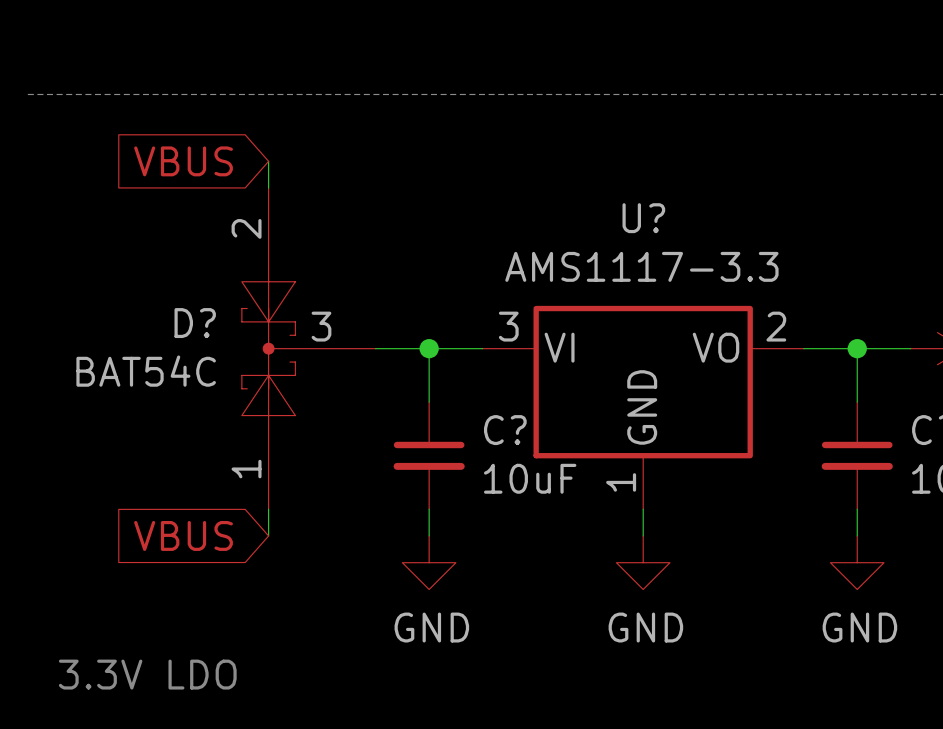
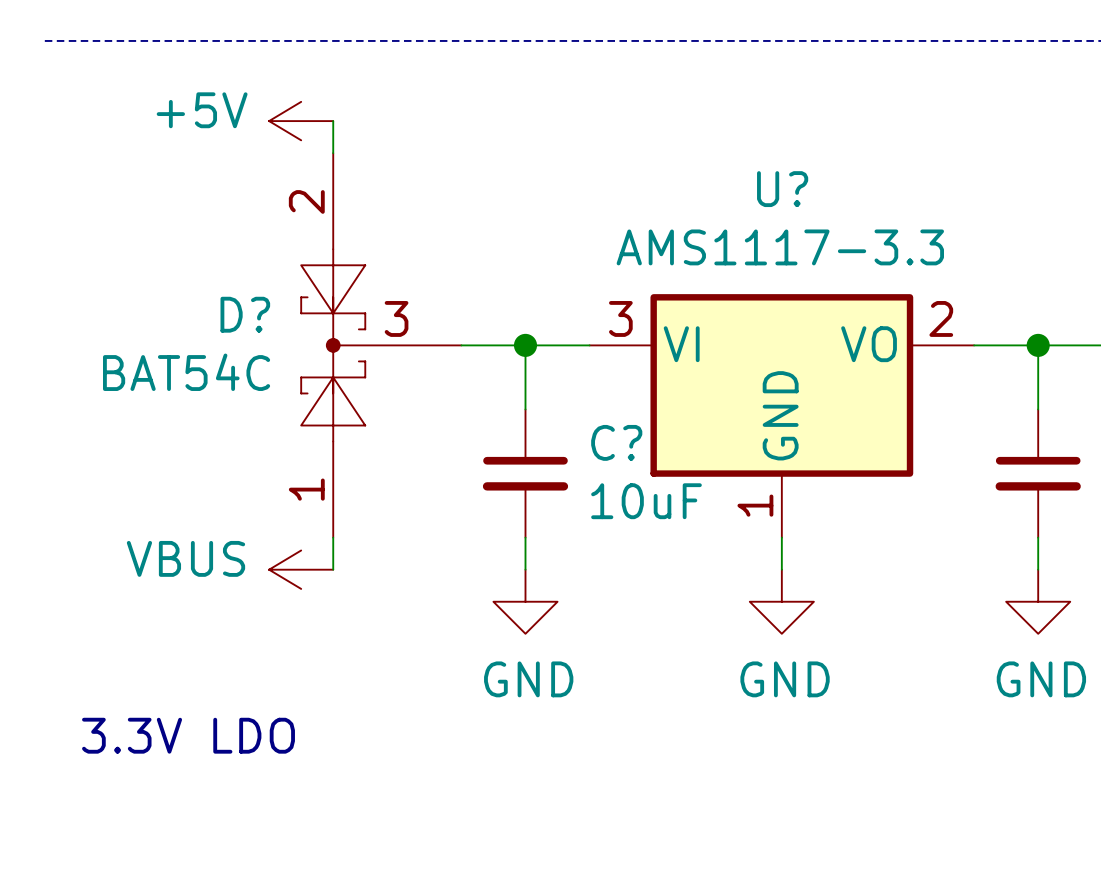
global label: VBUS (183, 161) -> none
power symbol: none -> +5V (301, 121)
global label: VBUS (183, 535) -> none
power symbol: none -> VBUS (301, 569)

